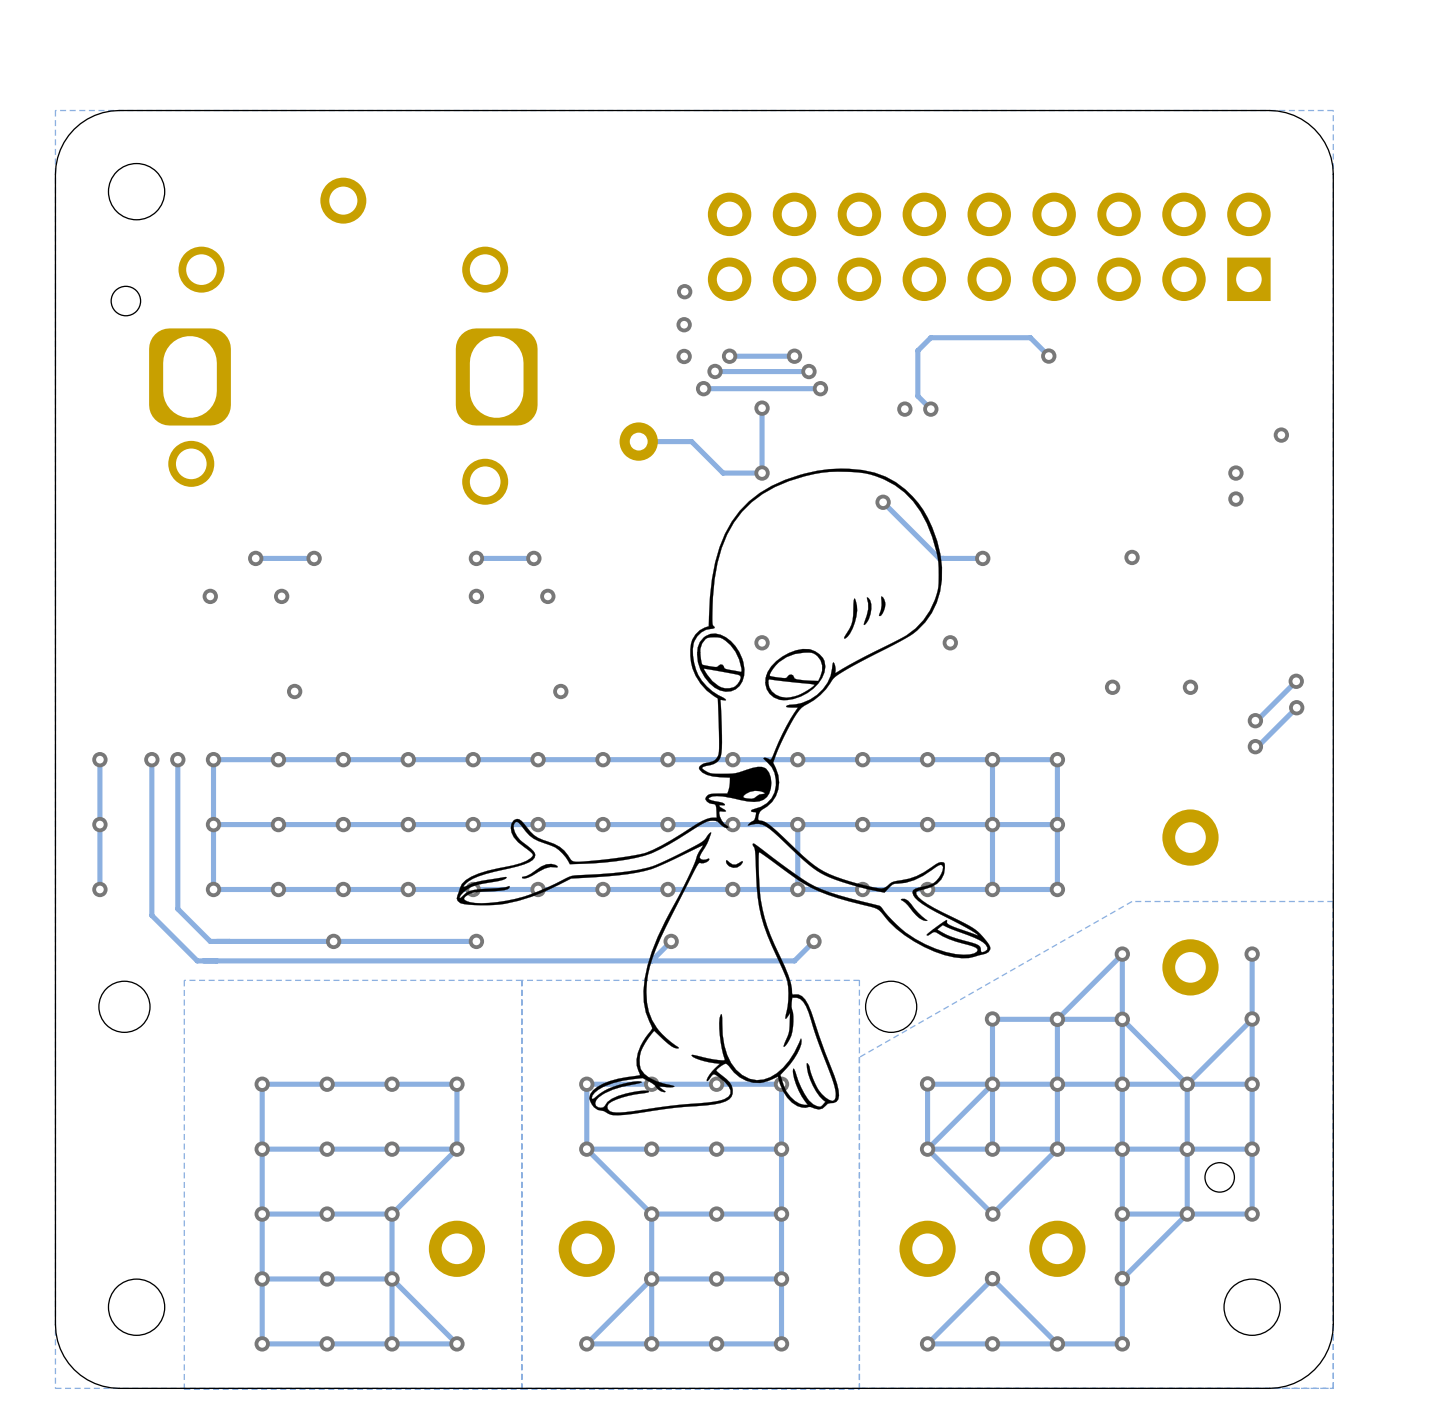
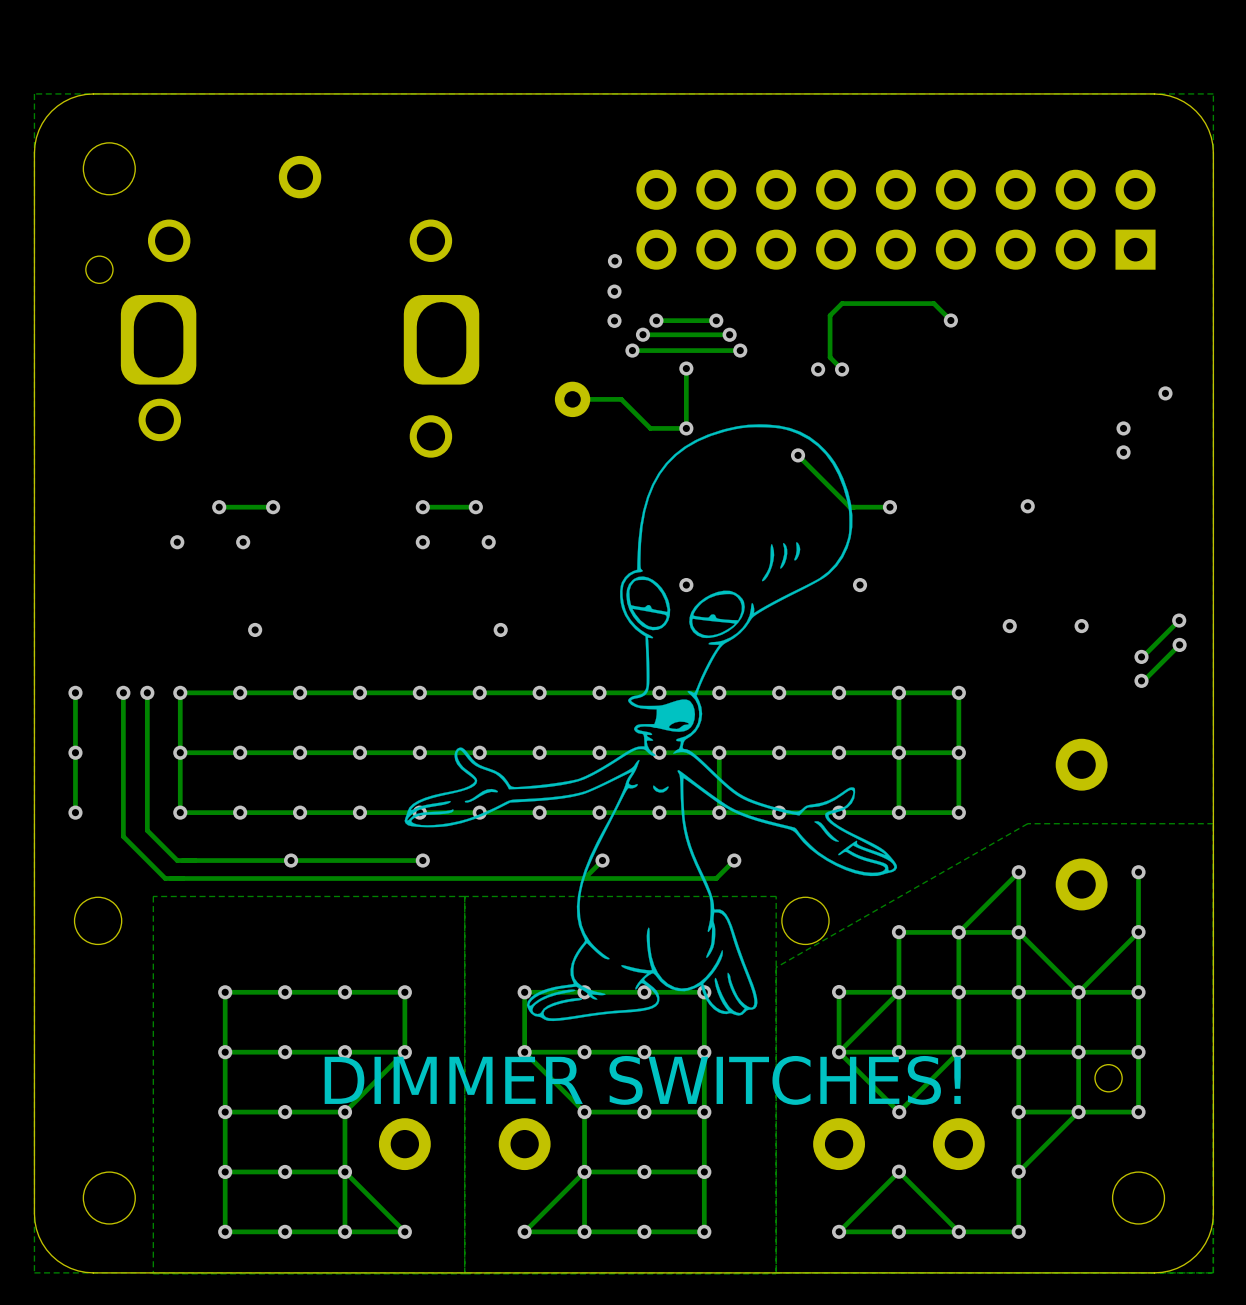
text: none -> DIMMER SWITCHES! (642, 1080)

